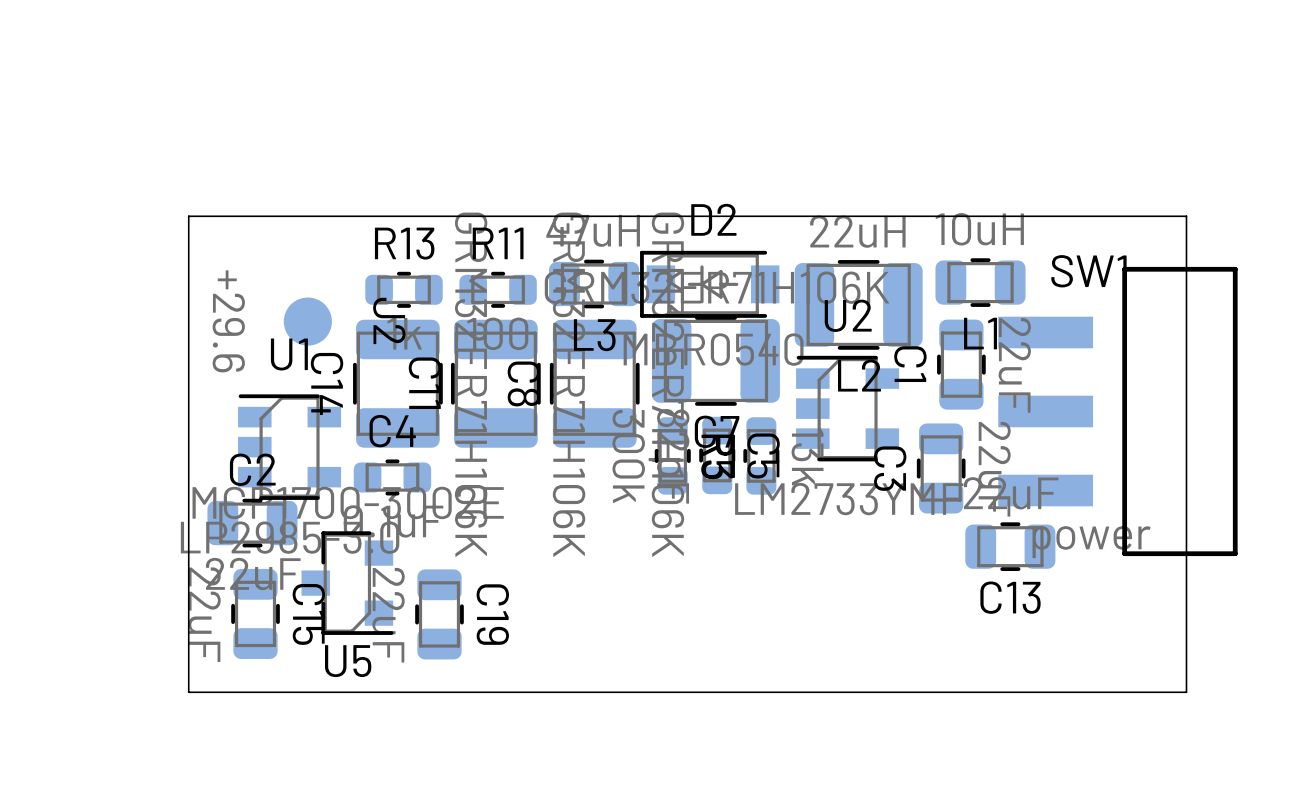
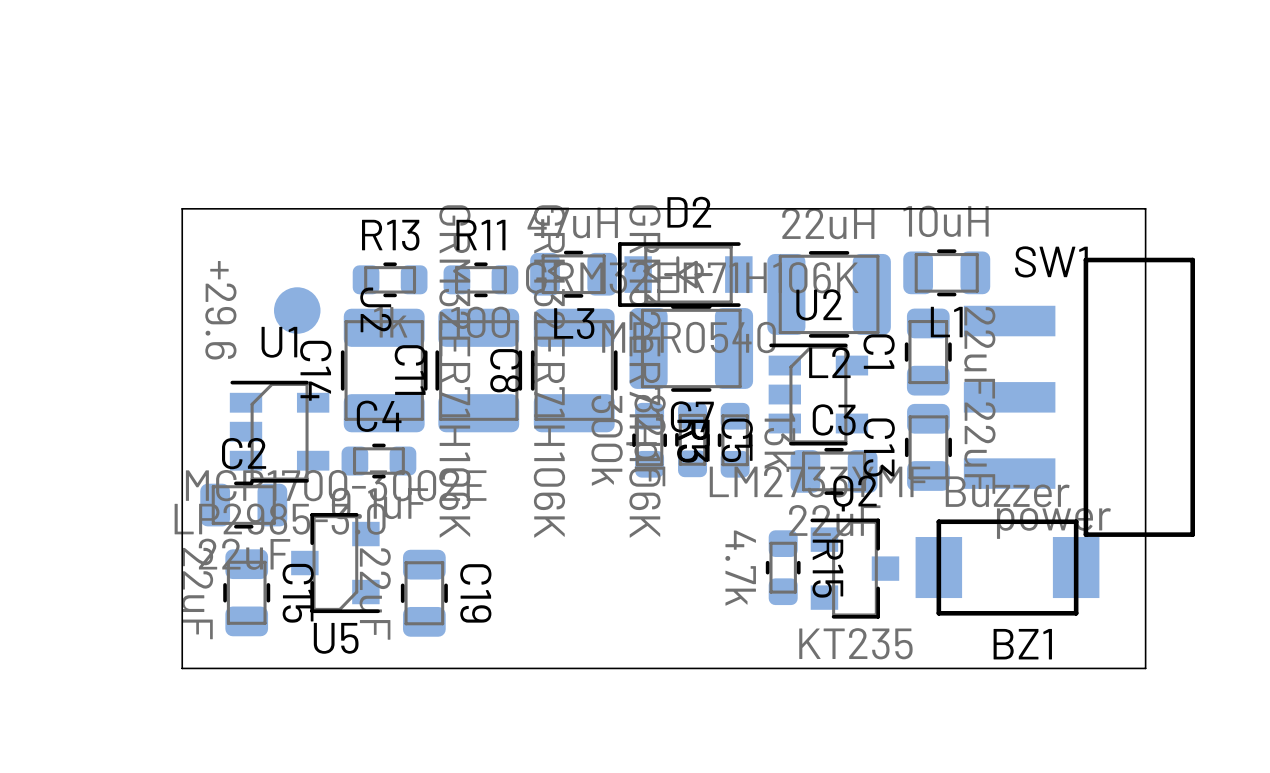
C3 rotation: 0° (941, 468) -> 90° clockwise (834, 471)
C3 position: (941, 468) -> (834, 471)
C13 rotation: 0° (1010, 546) -> 90° clockwise (928, 447)
C13 position: (1010, 546) -> (928, 447)
R15: none -> 4.7k (783, 567)
BZ1: none -> Buzzer (1007, 567)
Q2: none -> KT235 (854, 568)

